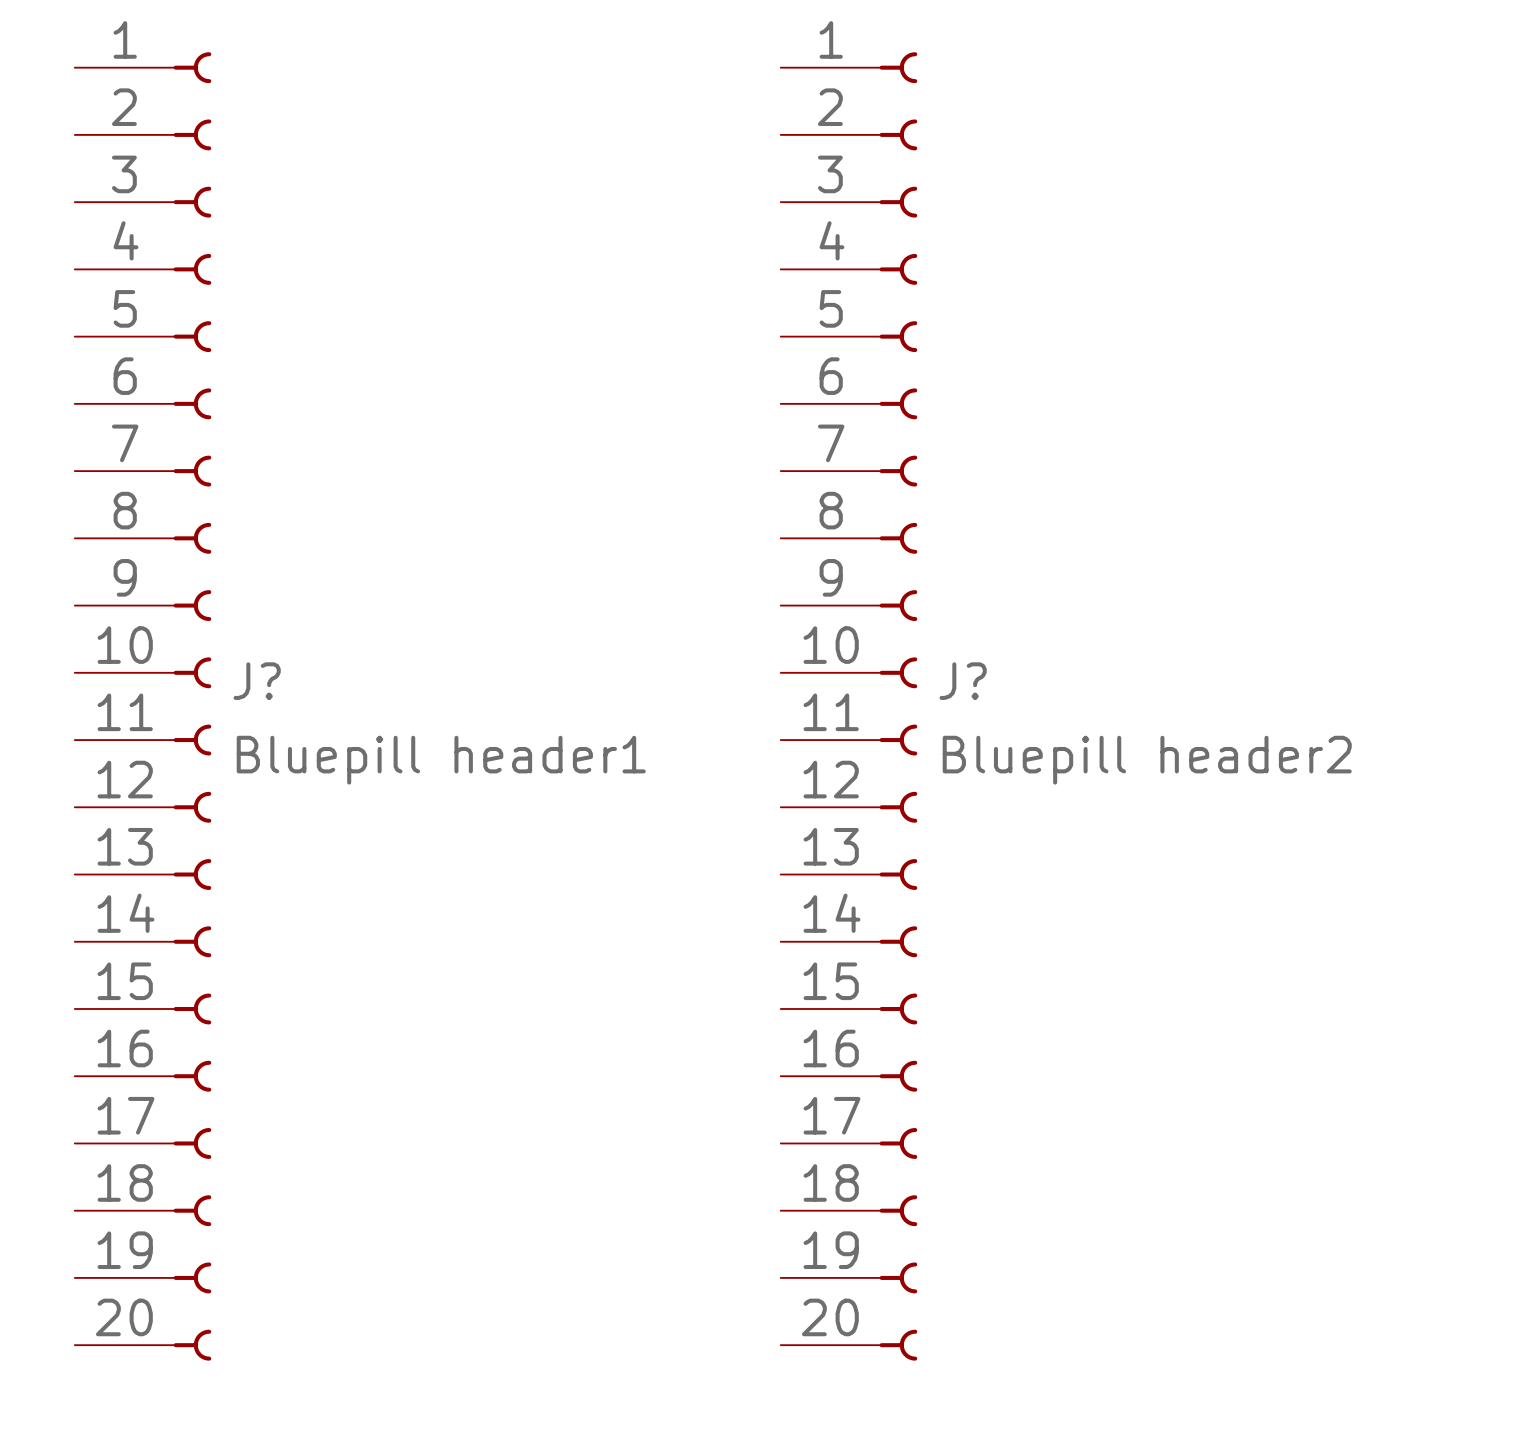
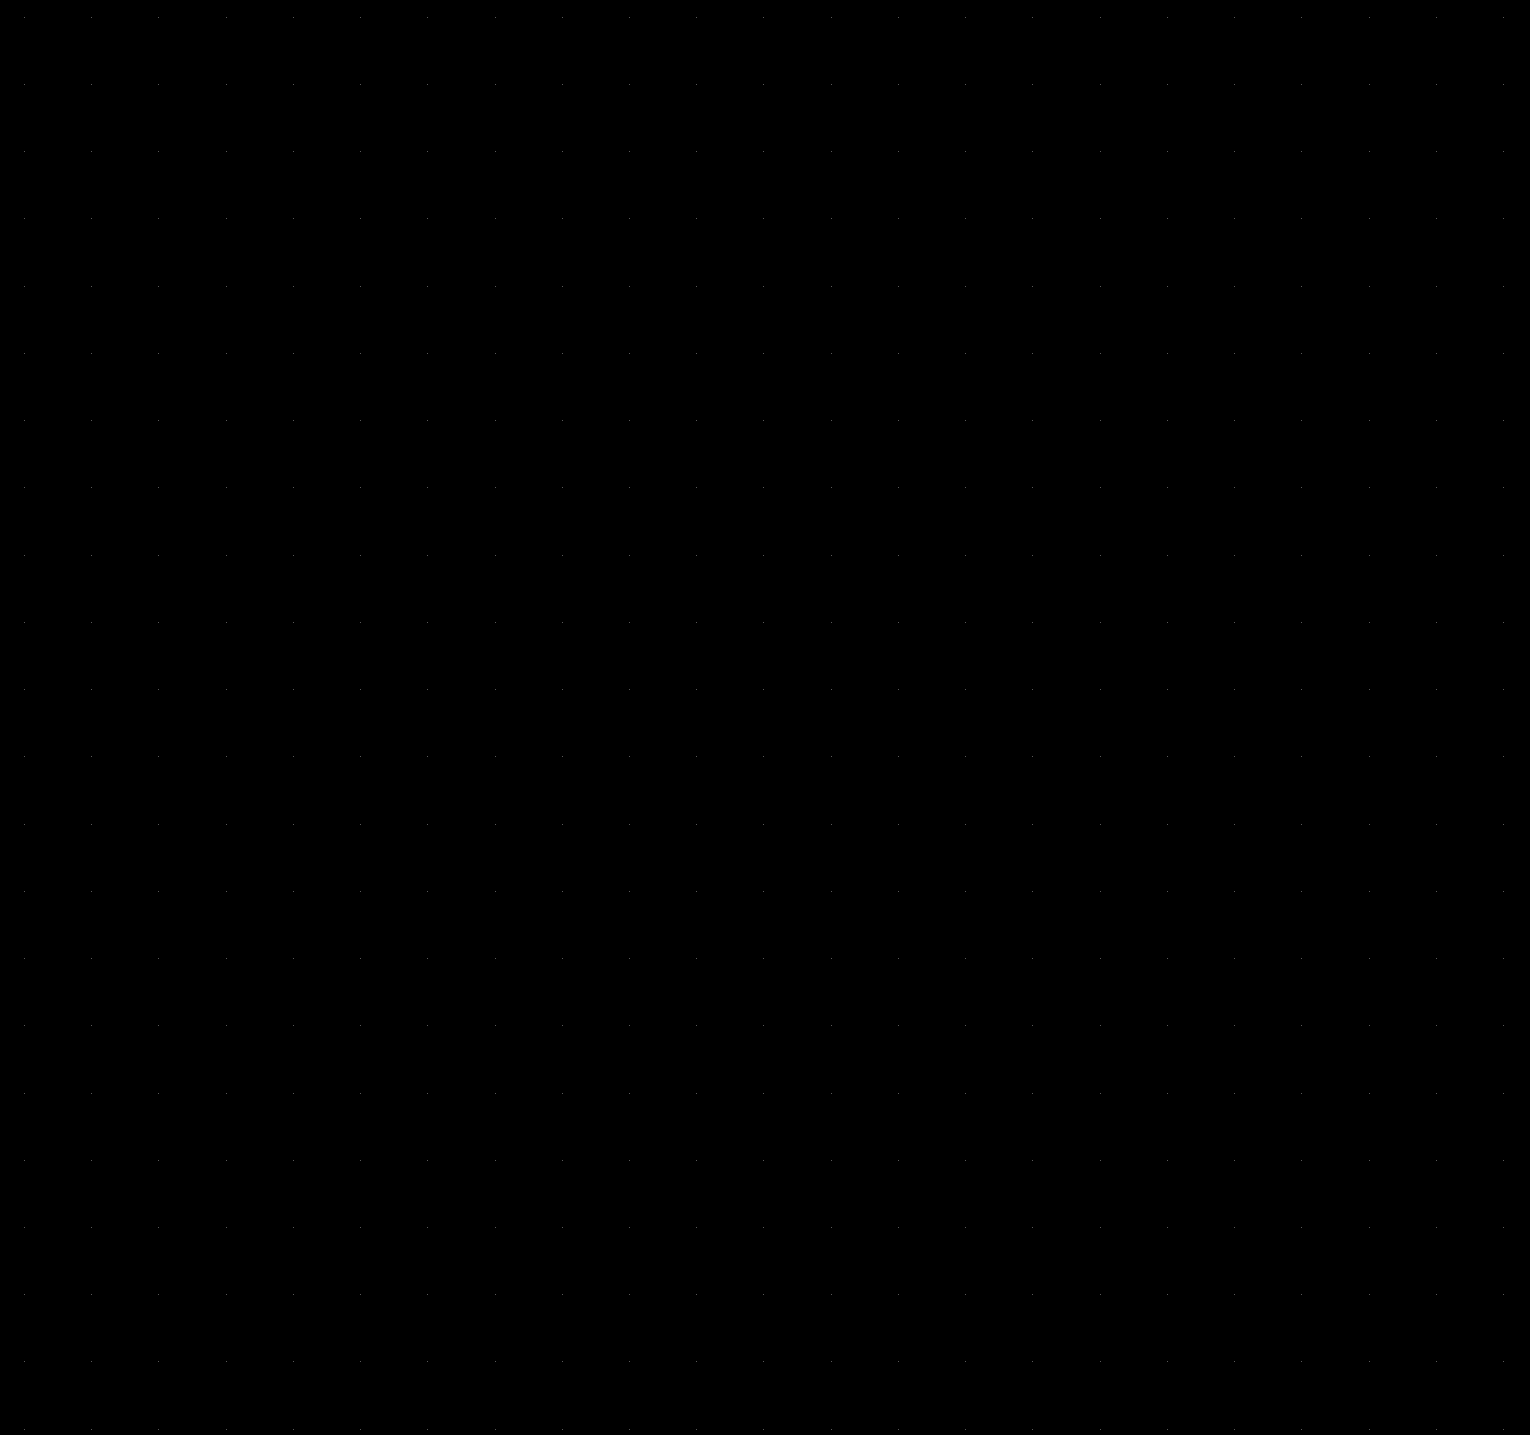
J?: Bluepill header1 (143, 706) -> none
J?: Bluepill header2 (849, 706) -> none

